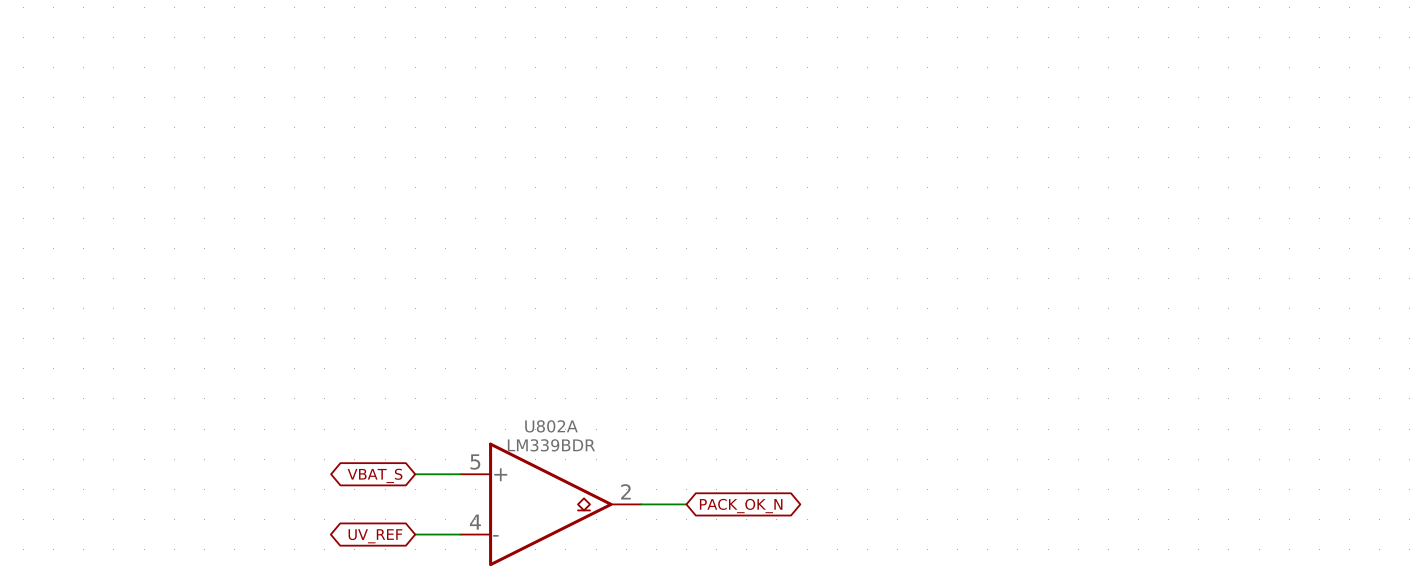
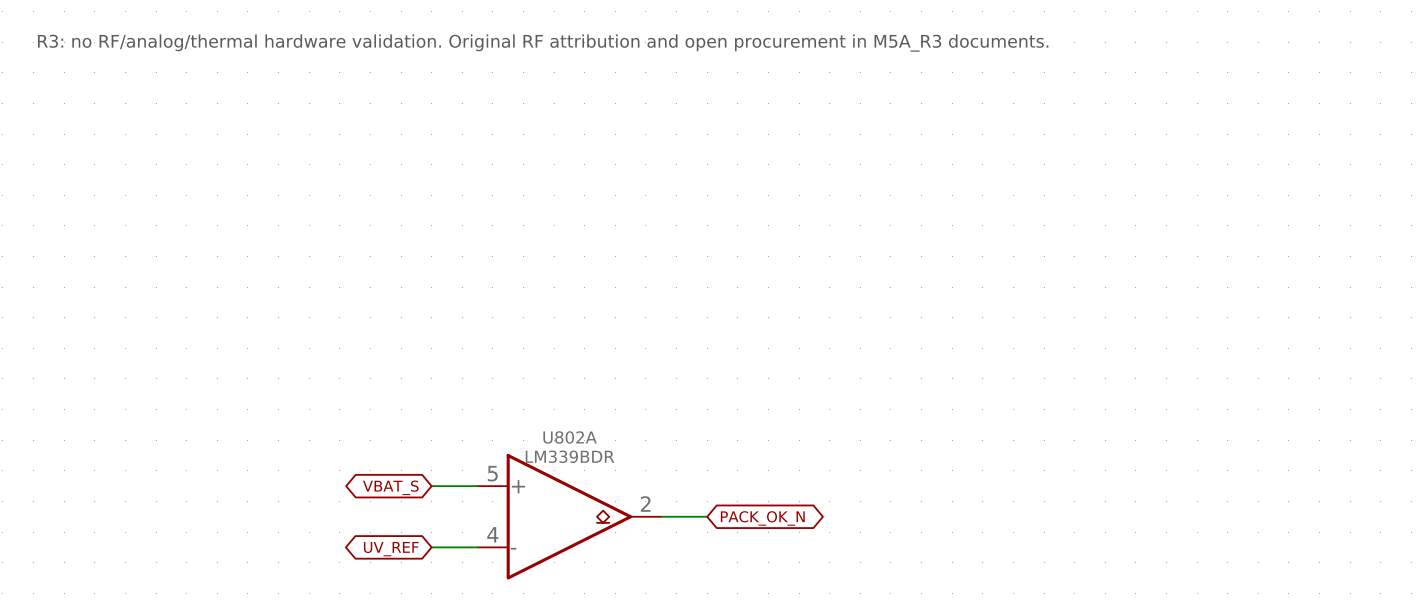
text: none -> R3: no RF/analog/thermal hardware validation. Original RF attribution and open procurement in M5A_R3 documents. (543, 43)

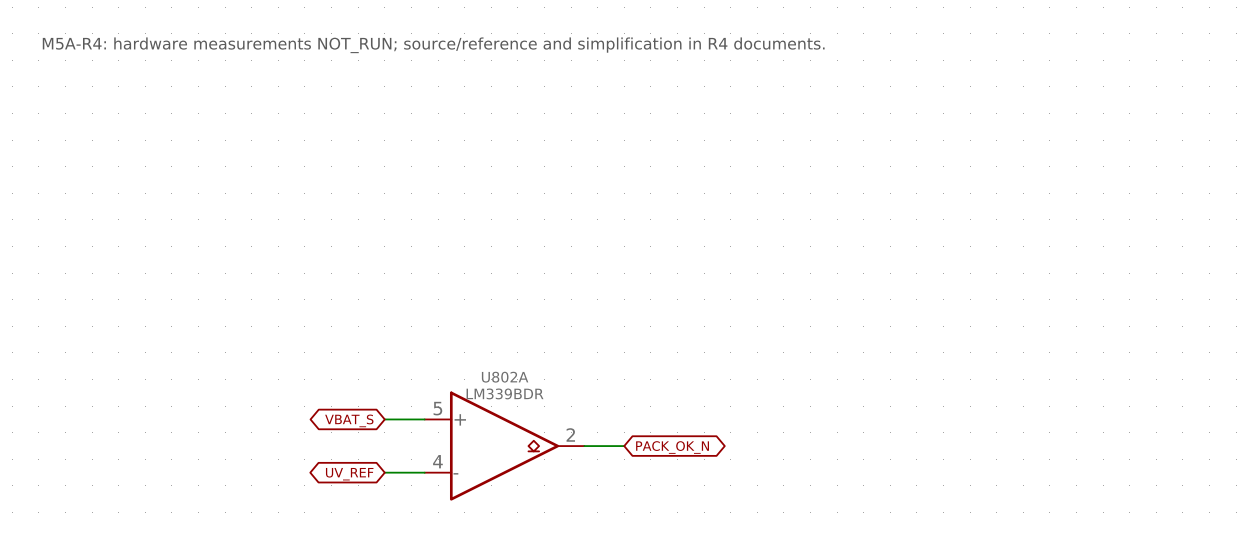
text: R3: no RF/analog/thermal hardware validation. Original RF attribution and open procurement in M5A_R3 documents. (543, 43) -> M5A-R4: hardware measurements NOT_RUN; source/reference and simplification in R4 documents. (433, 45)

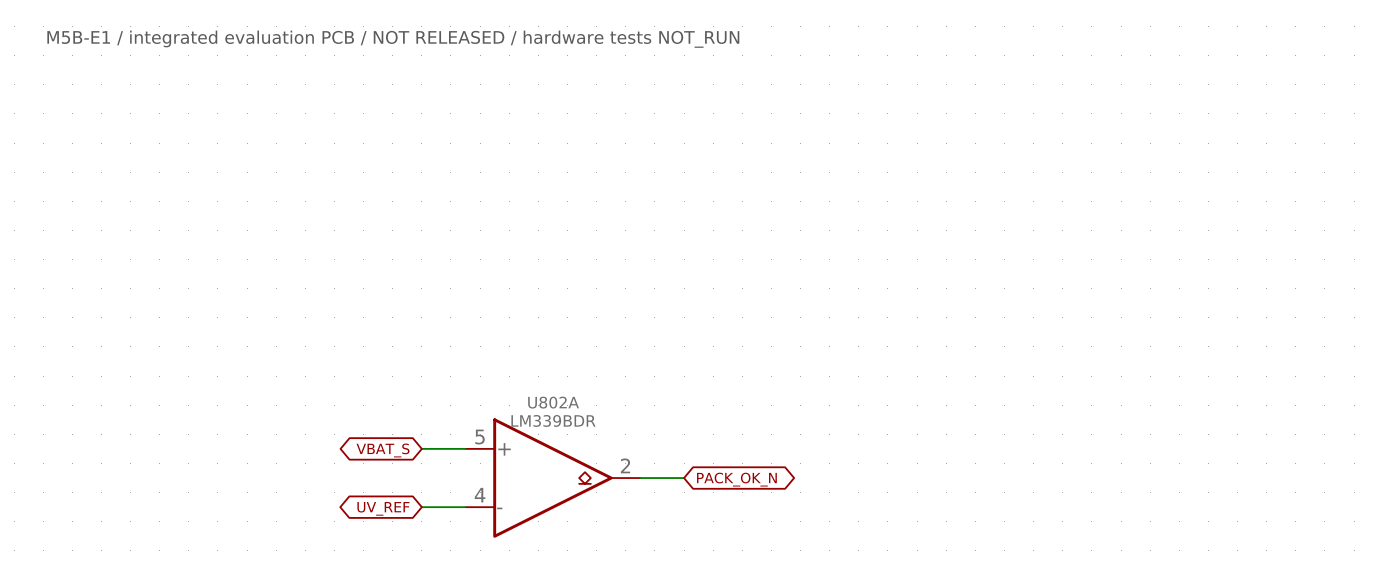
text: M5A-R4: hardware measurements NOT_RUN; source/reference and simplification in R4 documents. (433, 45) -> M5B-E1 / integrated evaluation PCB / NOT RELEASED / hardware tests NOT_RUN (393, 39)

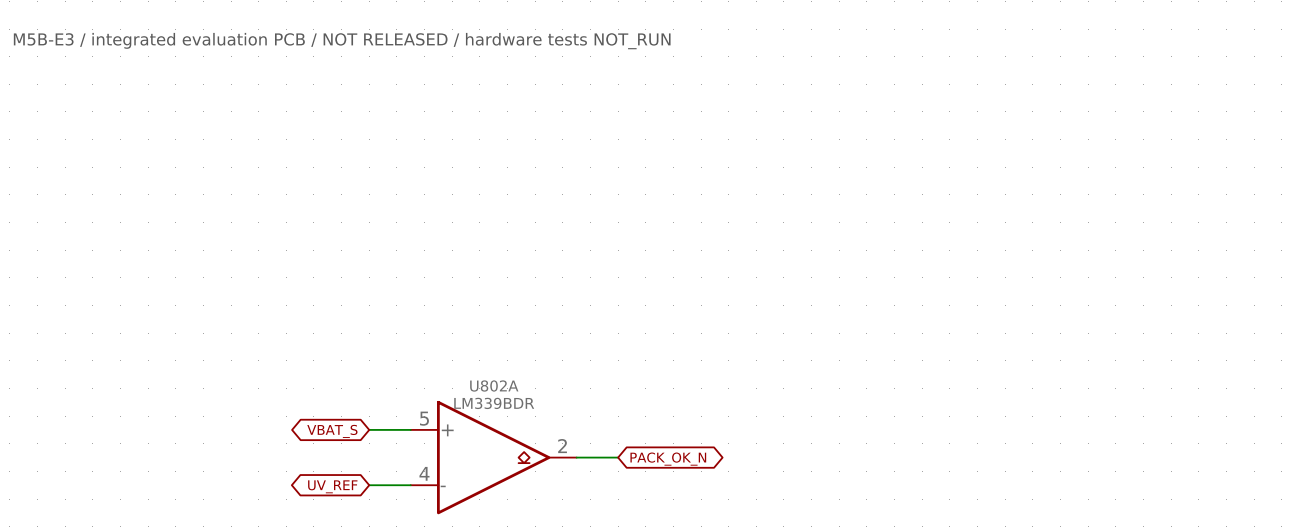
text: M5B-E1 / integrated evaluation PCB / NOT RELEASED / hardware tests NOT_RUN (393, 39) -> M5B-E3 / integrated evaluation PCB / NOT RELEASED / hardware tests NOT_RUN (342, 41)

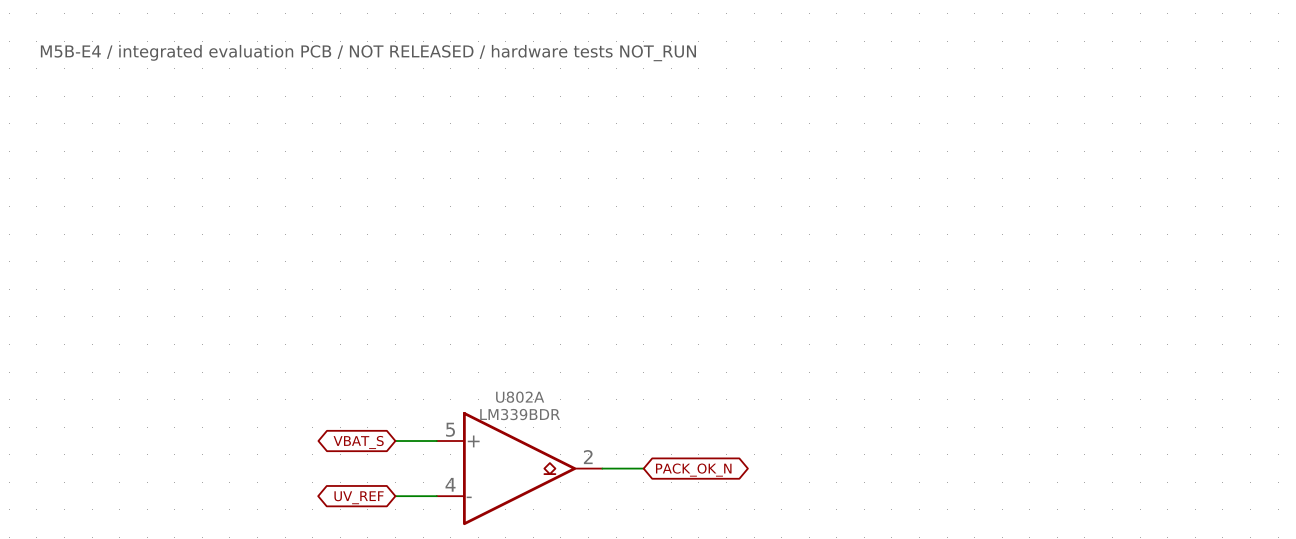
text: M5B-E3 / integrated evaluation PCB / NOT RELEASED / hardware tests NOT_RUN (342, 41) -> M5B-E4 / integrated evaluation PCB / NOT RELEASED / hardware tests NOT_RUN (368, 53)

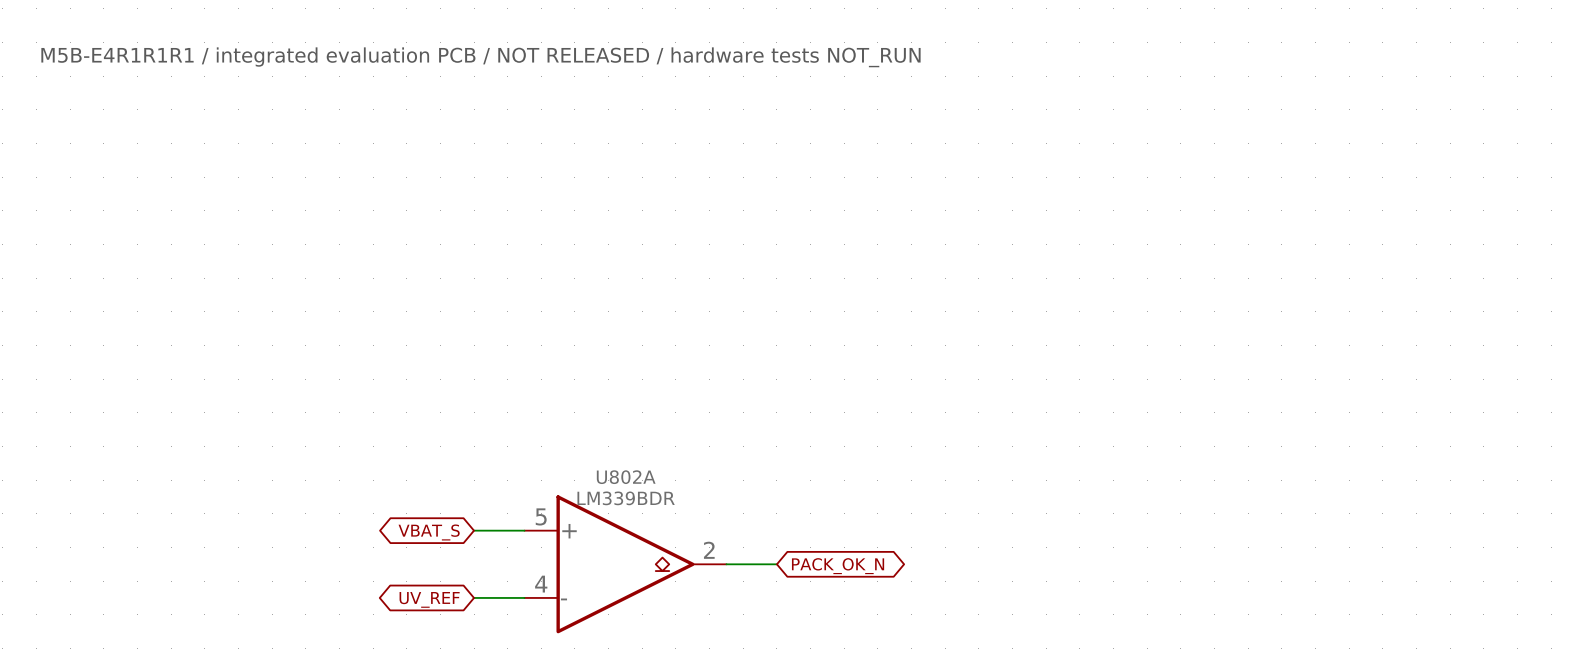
text: M5B-E4 / integrated evaluation PCB / NOT RELEASED / hardware tests NOT_RUN (368, 53) -> M5B-E4R1R1R1 / integrated evaluation PCB / NOT RELEASED / hardware tests NOT_RUN (480, 57)

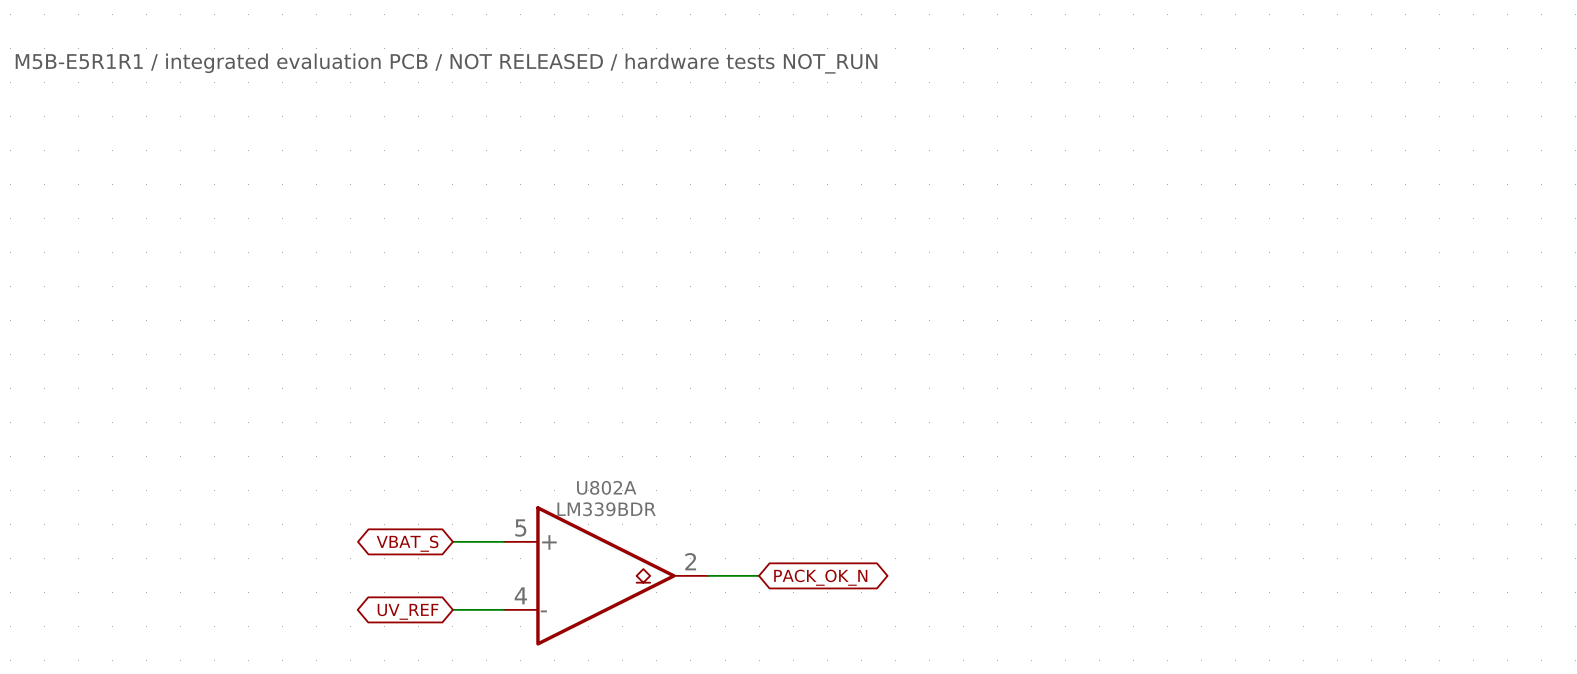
text: M5B-E4R1R1R1 / integrated evaluation PCB / NOT RELEASED / hardware tests NOT_RUN (480, 57) -> M5B-E5R1R1 / integrated evaluation PCB / NOT RELEASED / hardware tests NOT_RUN (446, 63)

